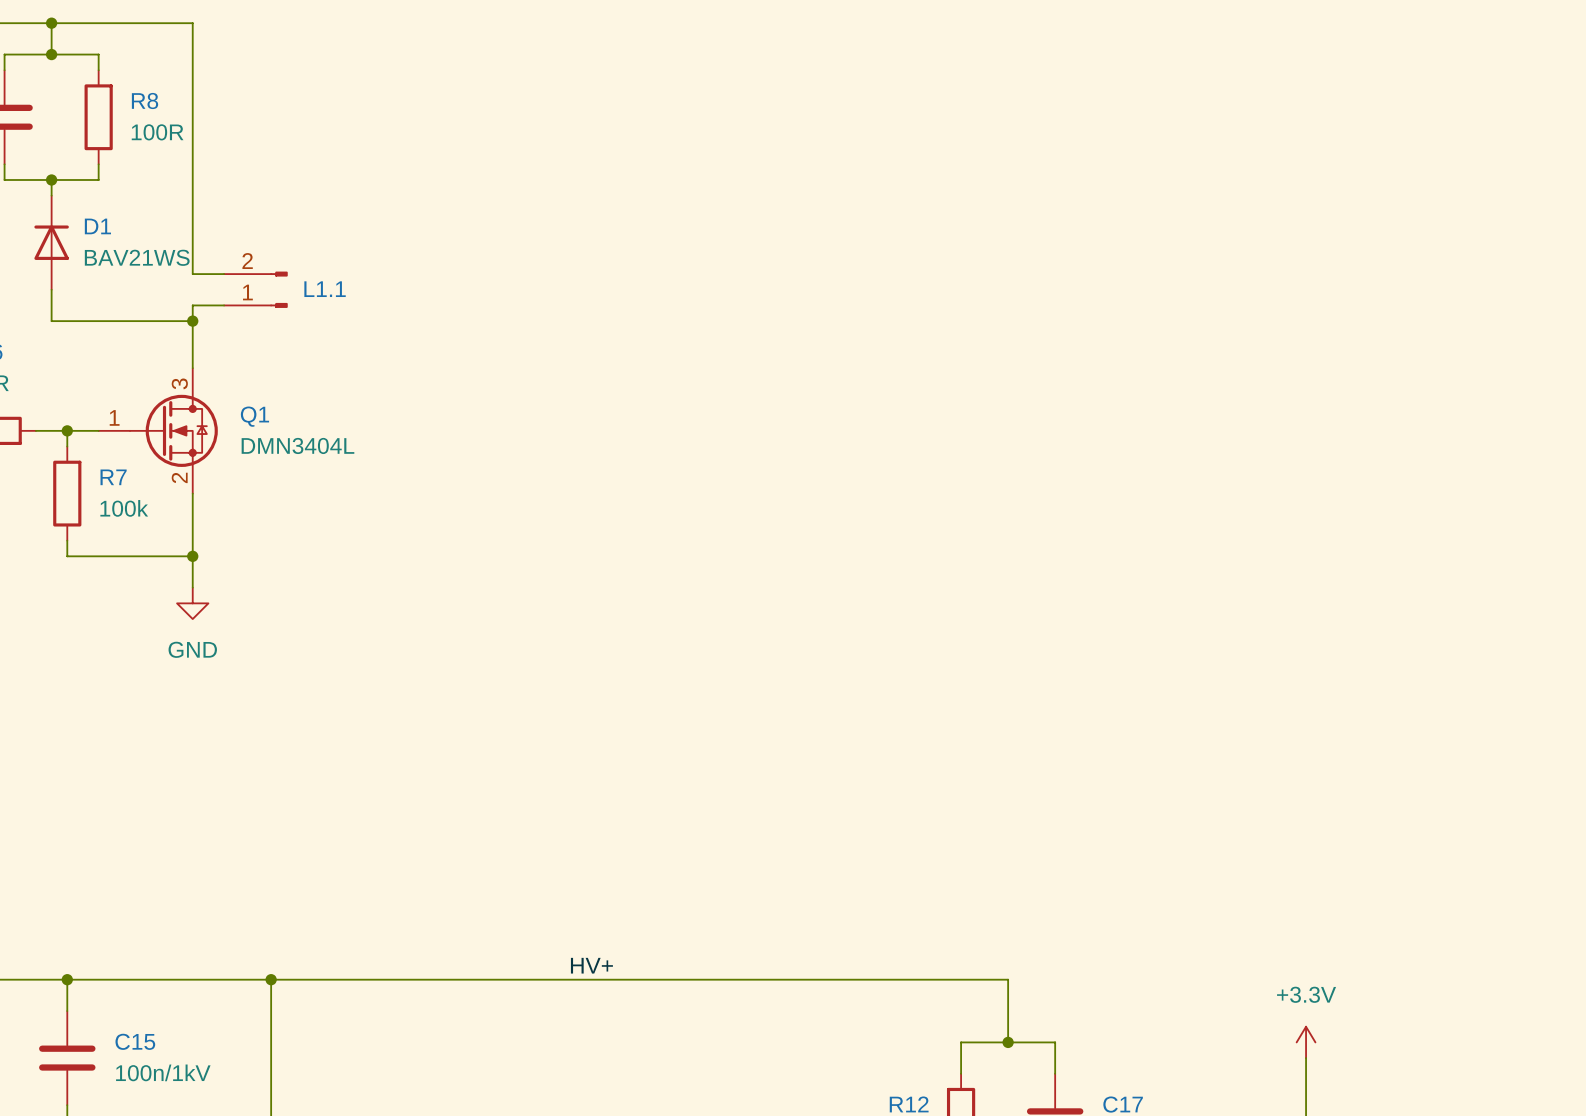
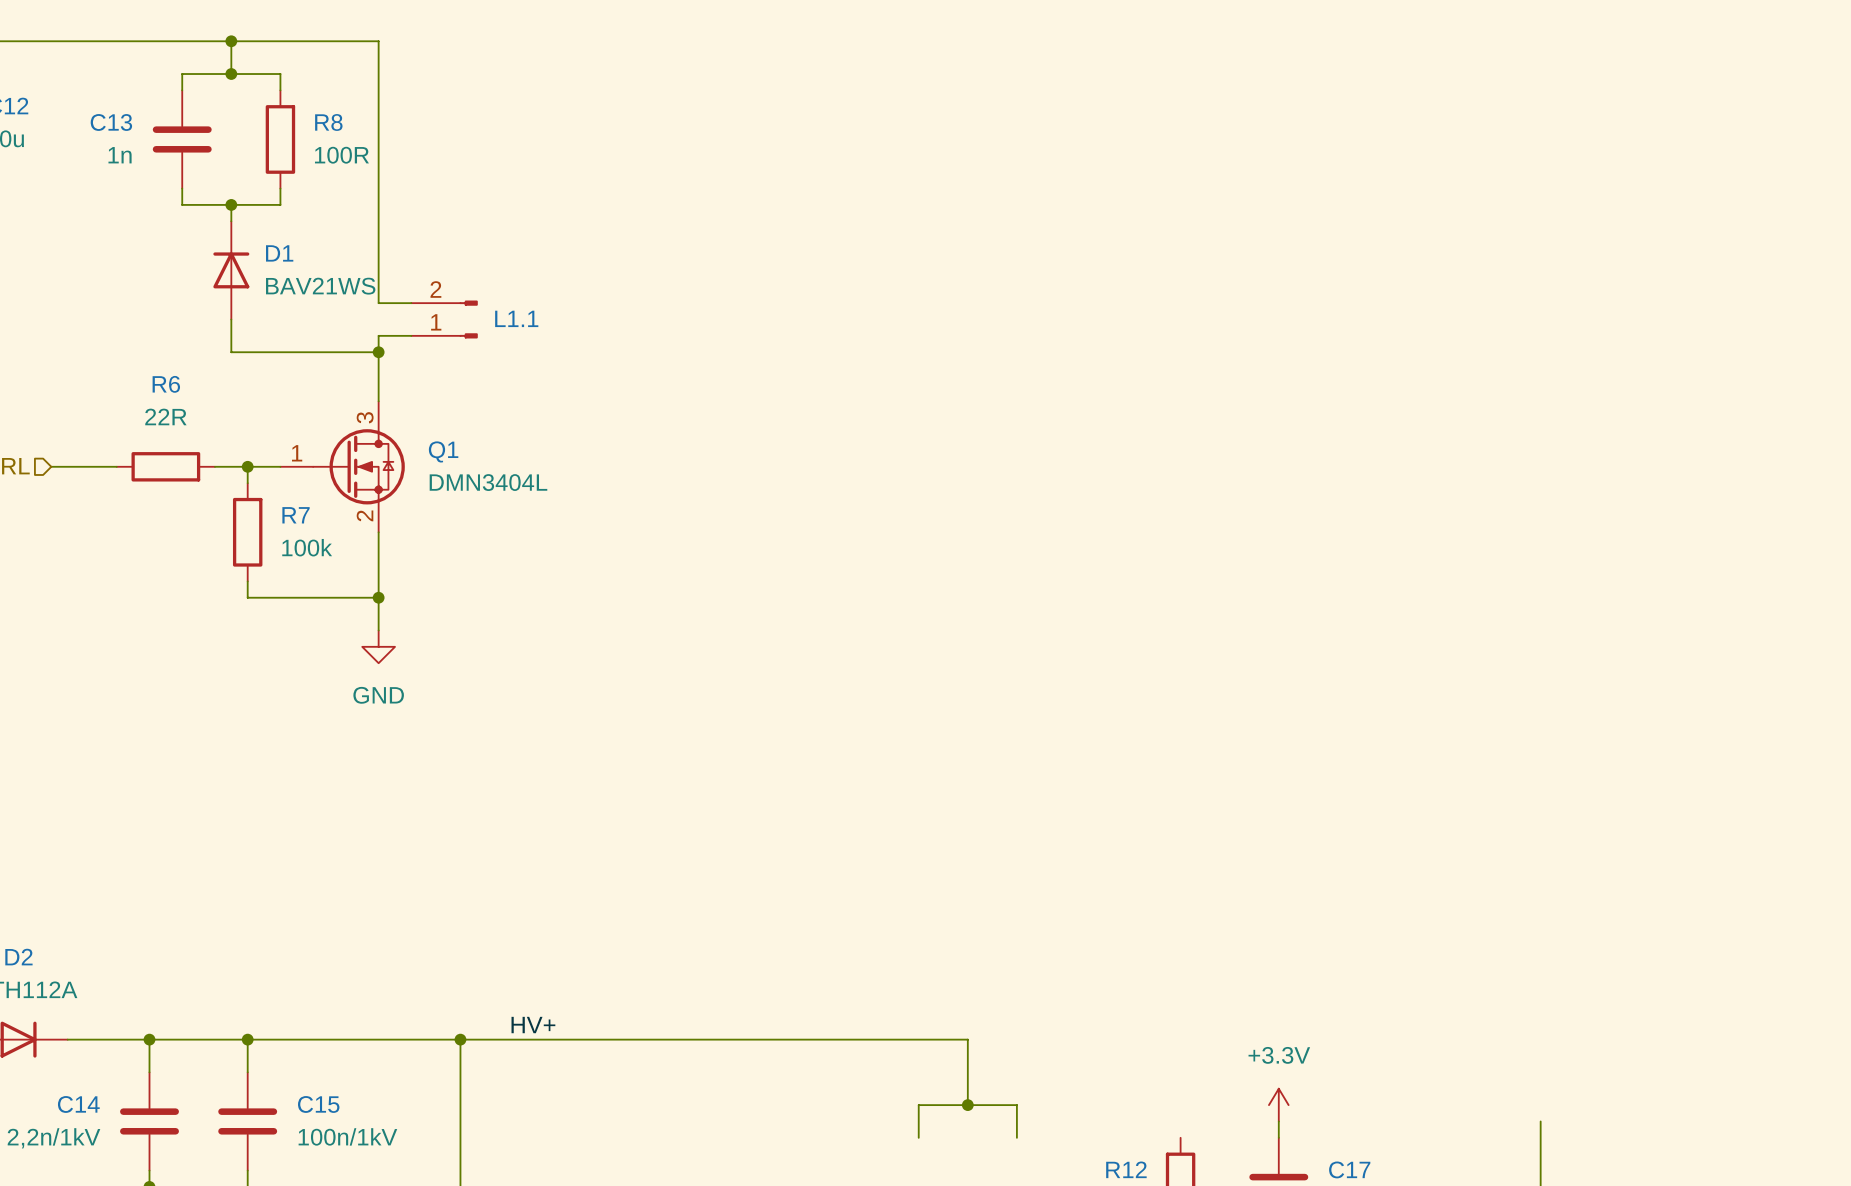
label position: HV+ (591, 965) -> HV+ (533, 1025)
wire: (757, 979) (1008, 979) (1008, 1042) -> (967, 1039) (967, 1105)
junction: none -> (967, 1105)
junction: (1008, 1042) -> none
power symbol position: +3.3V (1306, 1042) -> +3.3V (1278, 1105)
wire: (1055, 1058) (1055, 1042) (961, 1042) (961, 1073) -> none
wire: none -> (918, 1137) (918, 1105) (1016, 1105) (1016, 1137)

